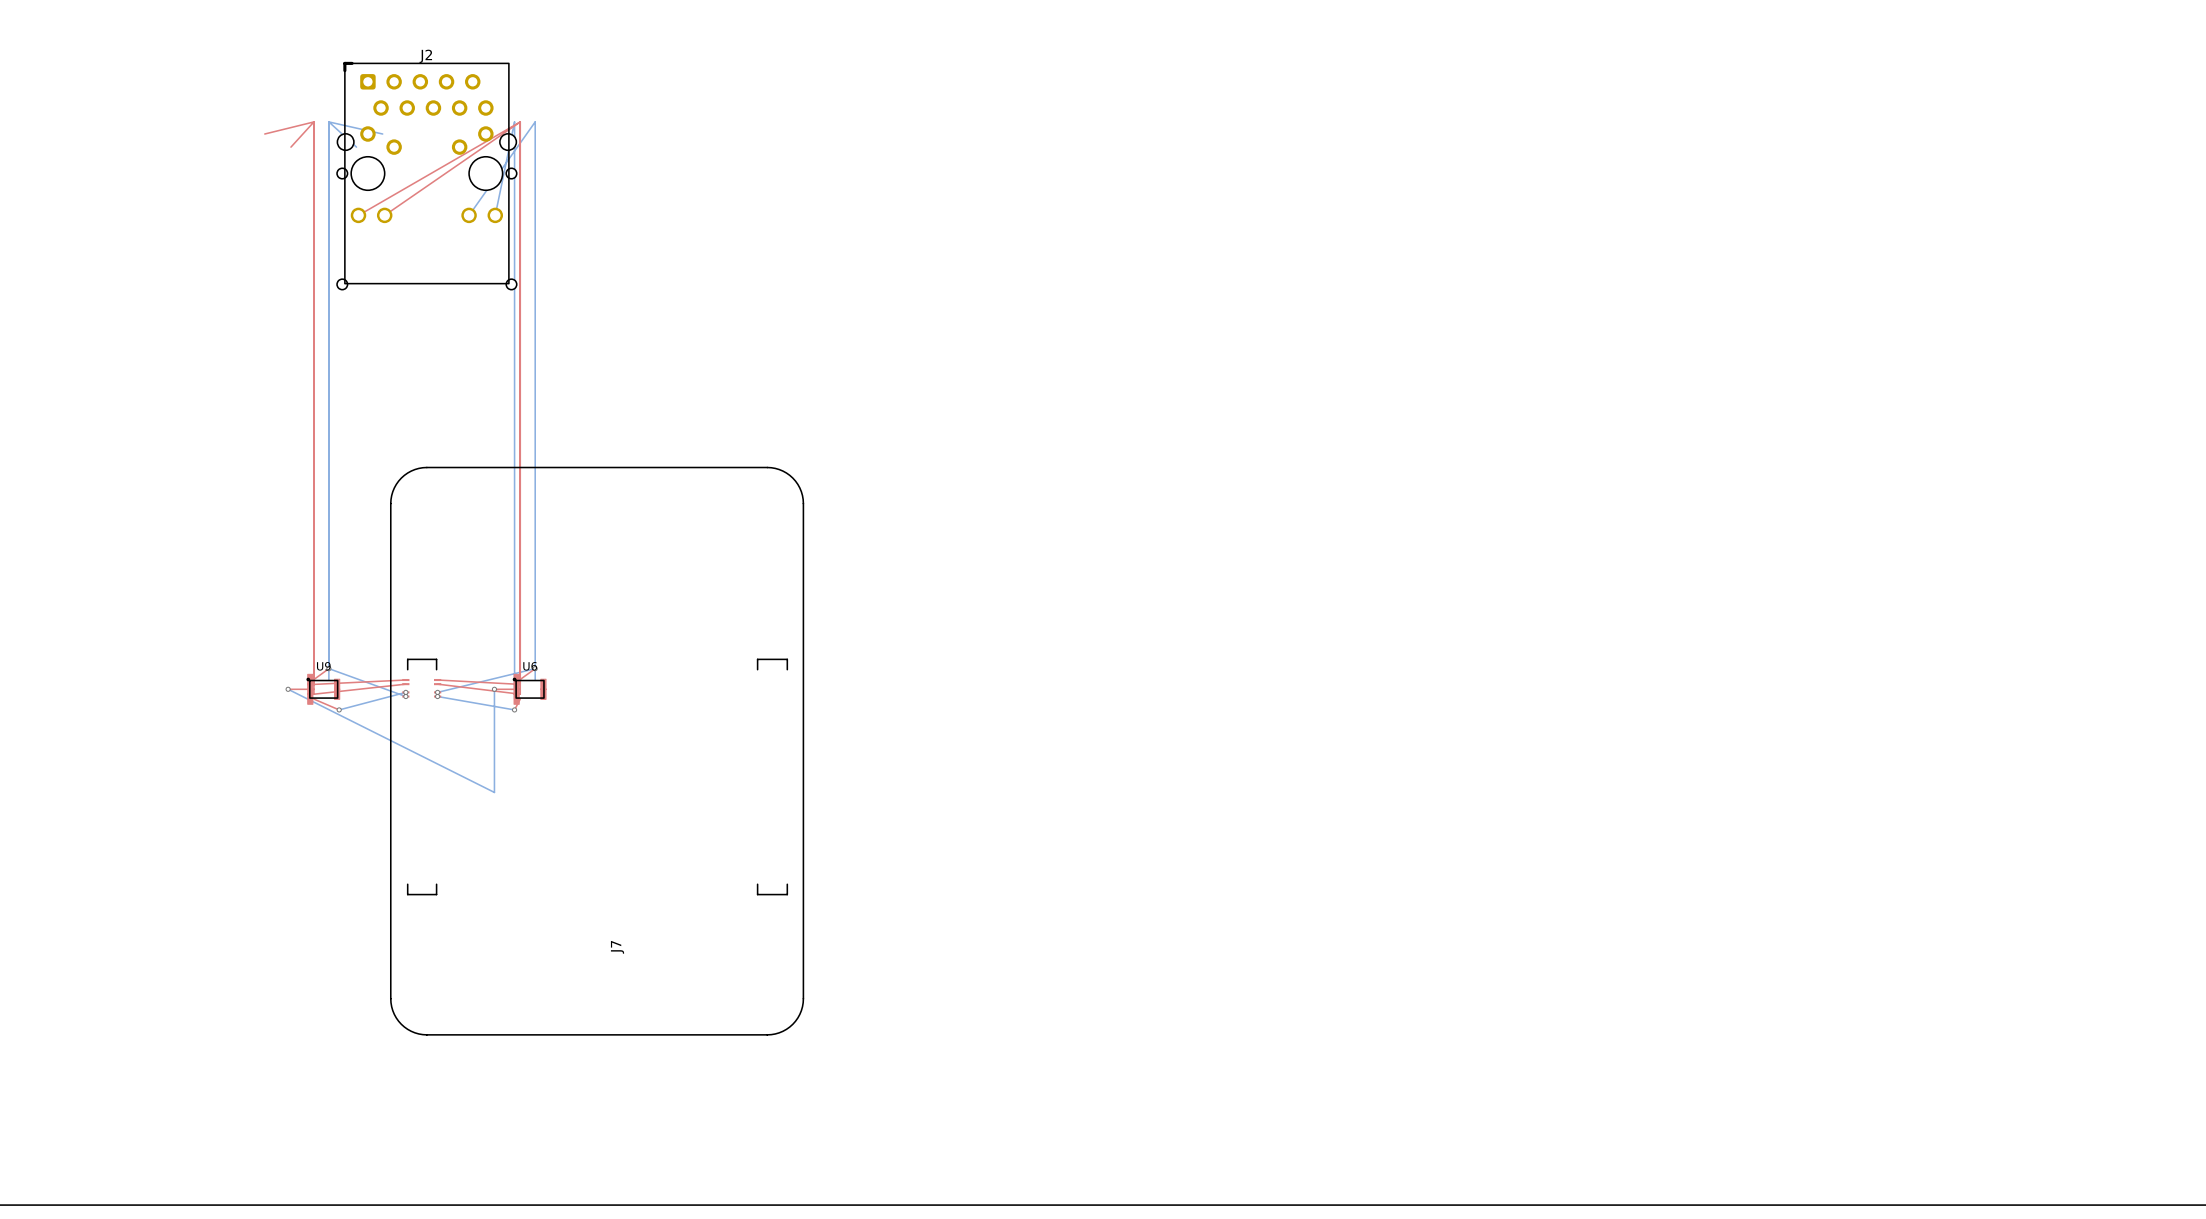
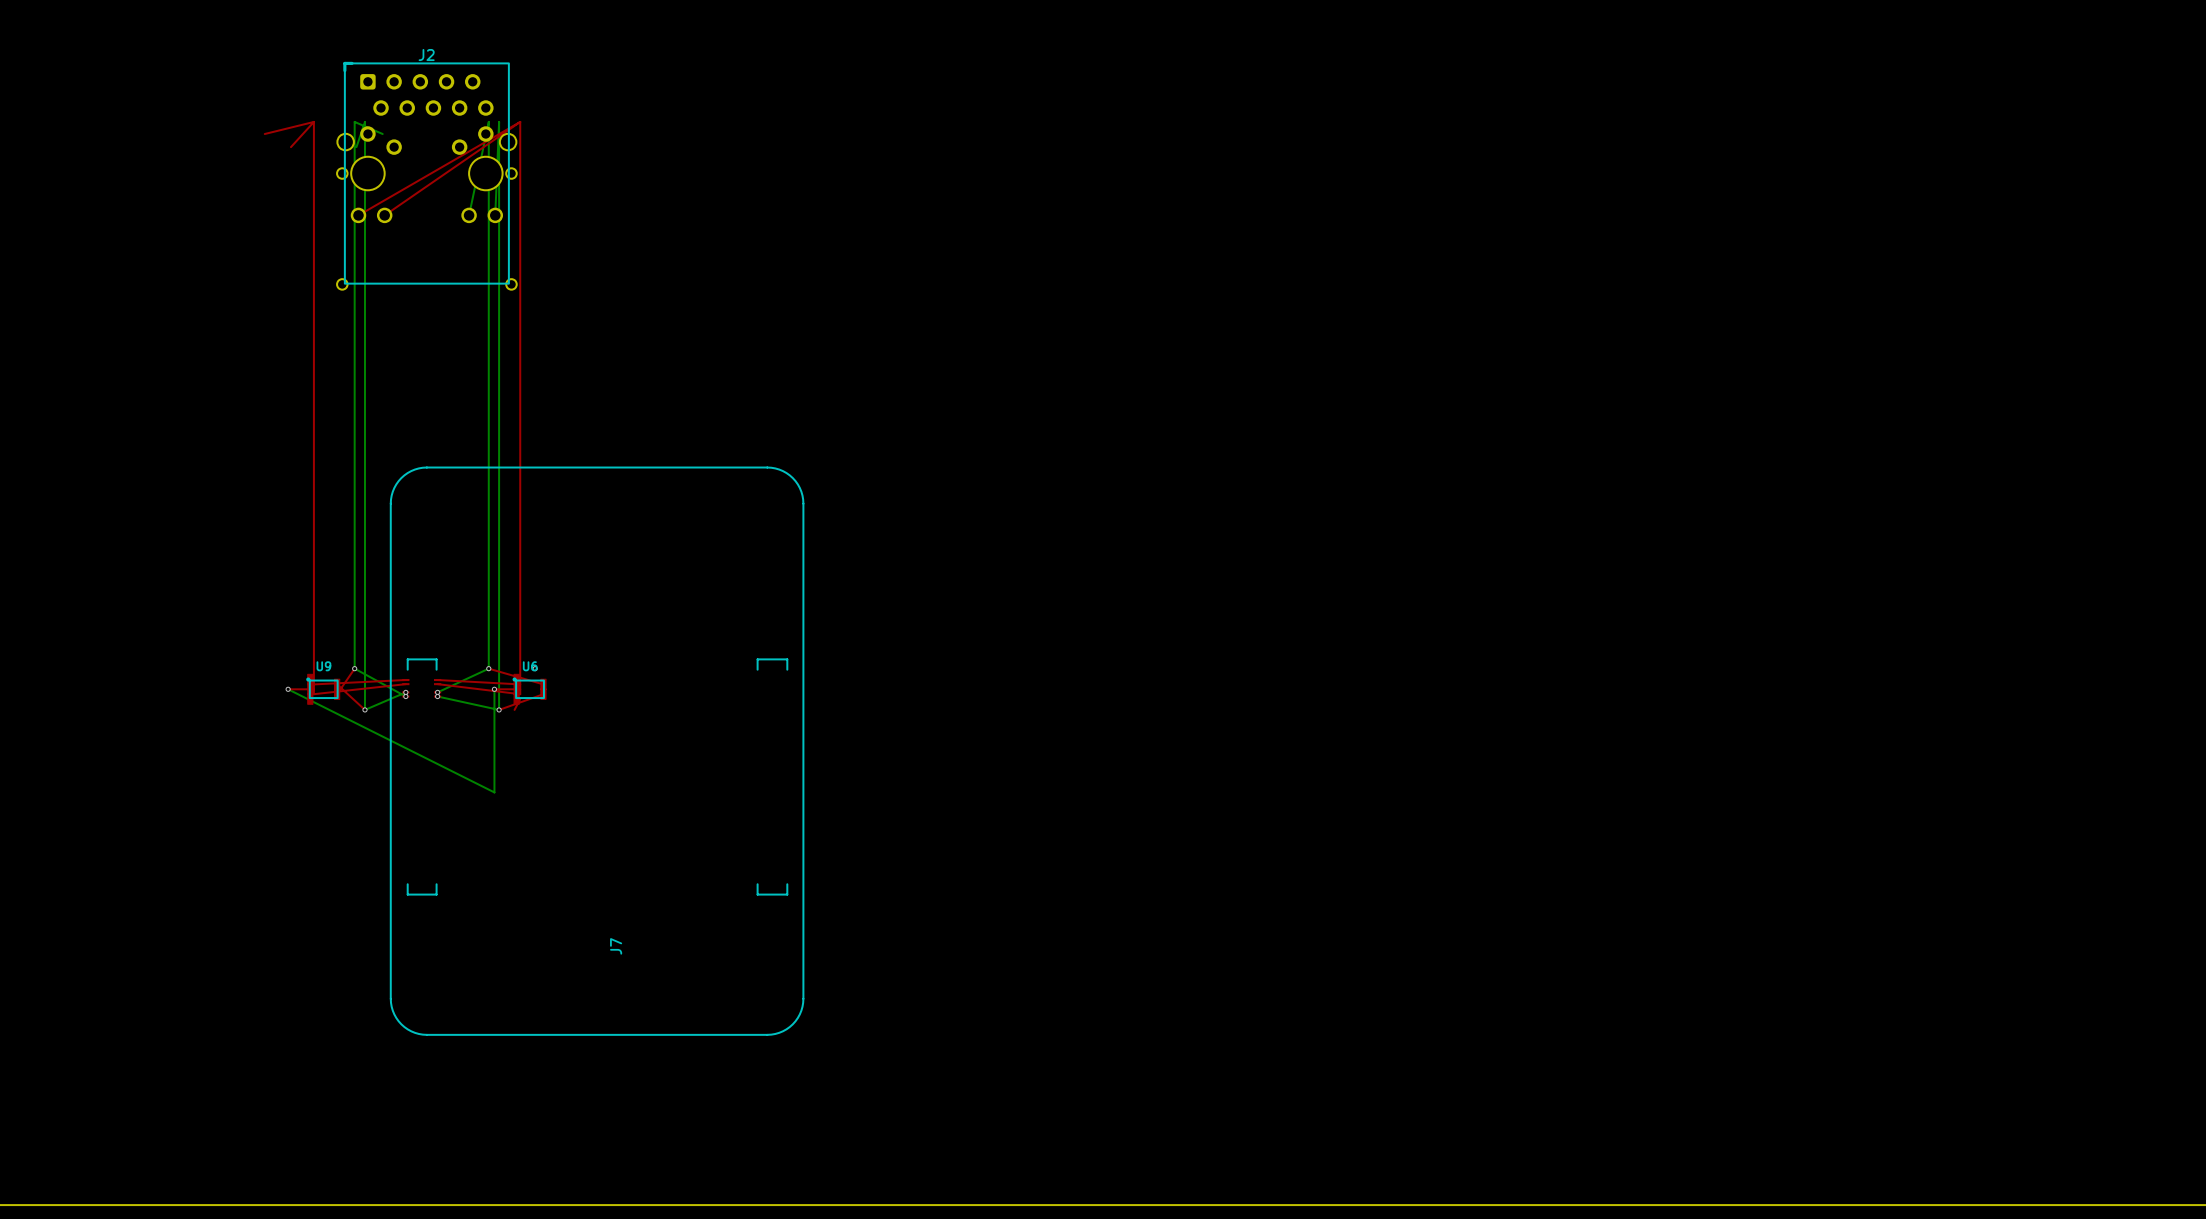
bottom track: (328, 121) (356, 147) -> none
bottom track: (328, 121) (328, 679) -> none
bottom track: (328, 121) (382, 134) -> none
bottom track: (469, 215) (535, 121) (535, 679) -> (469, 215) (488, 121) (488, 668) (437, 692)
bottom track: (495, 215) (514, 121) (514, 699) -> (495, 215) (499, 121) (499, 709) (437, 696)
top track: (328, 668) (313, 679) -> none
bottom track: (328, 668) (405, 696) -> (382, 134) (354, 121) (354, 668) (405, 696)
via: (328, 668) -> none
top track: none -> (354, 668) (337, 694)
via: none -> (354, 668)
top track: none -> (488, 668) (543, 684)
via: none -> (488, 668)
top track: (535, 668) (520, 679) -> none
bottom track: (535, 668) (437, 692) -> none
top track: none -> (337, 684) (364, 709)
bottom track: (405, 692) (339, 709) -> (405, 692) (364, 709) (364, 121) (356, 147)
top track: none -> (543, 694) (499, 709)
bottom track: (437, 696) (514, 709) -> none
top track: (313, 699) (339, 709) -> none
via: (339, 709) -> none
via: none -> (364, 709)
via position: (514, 709) -> (499, 709)

